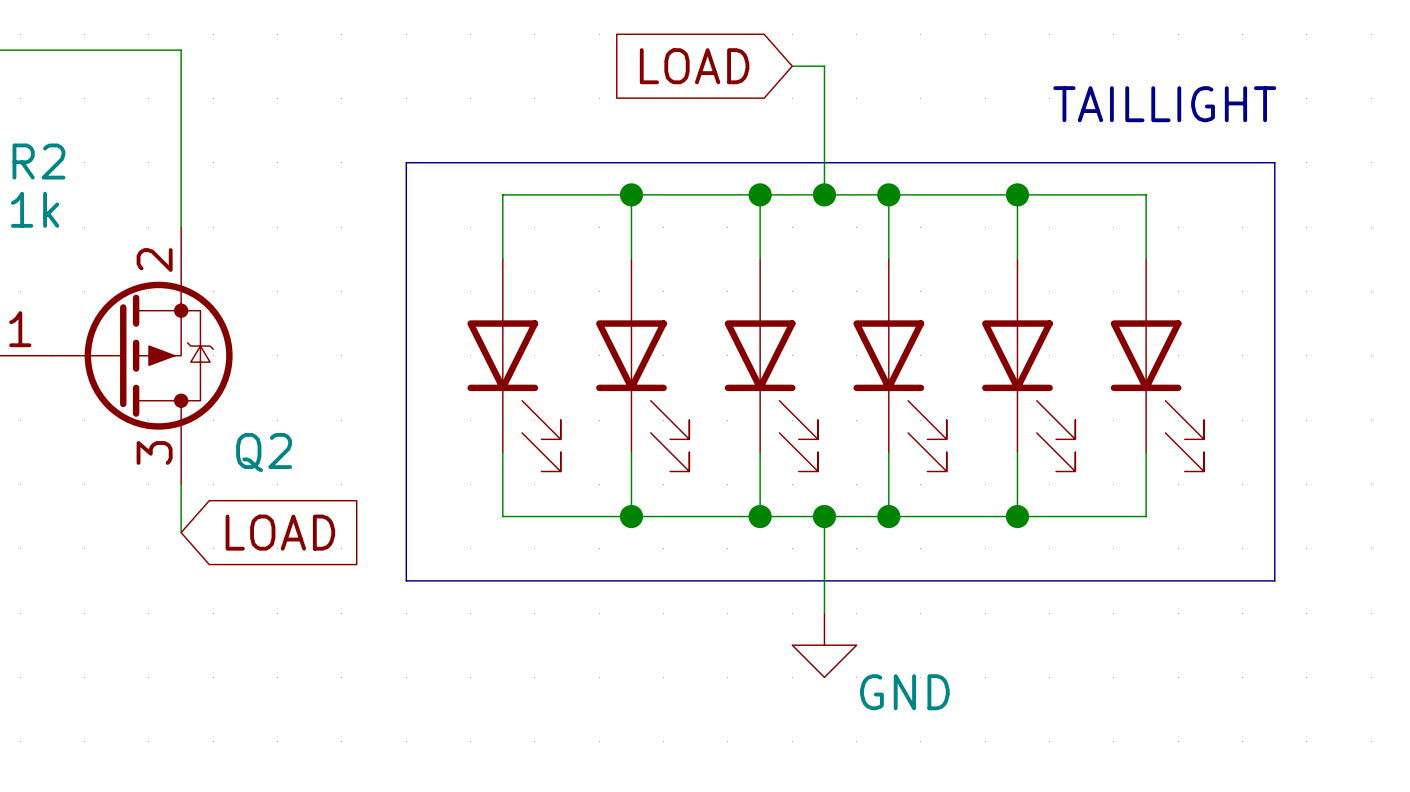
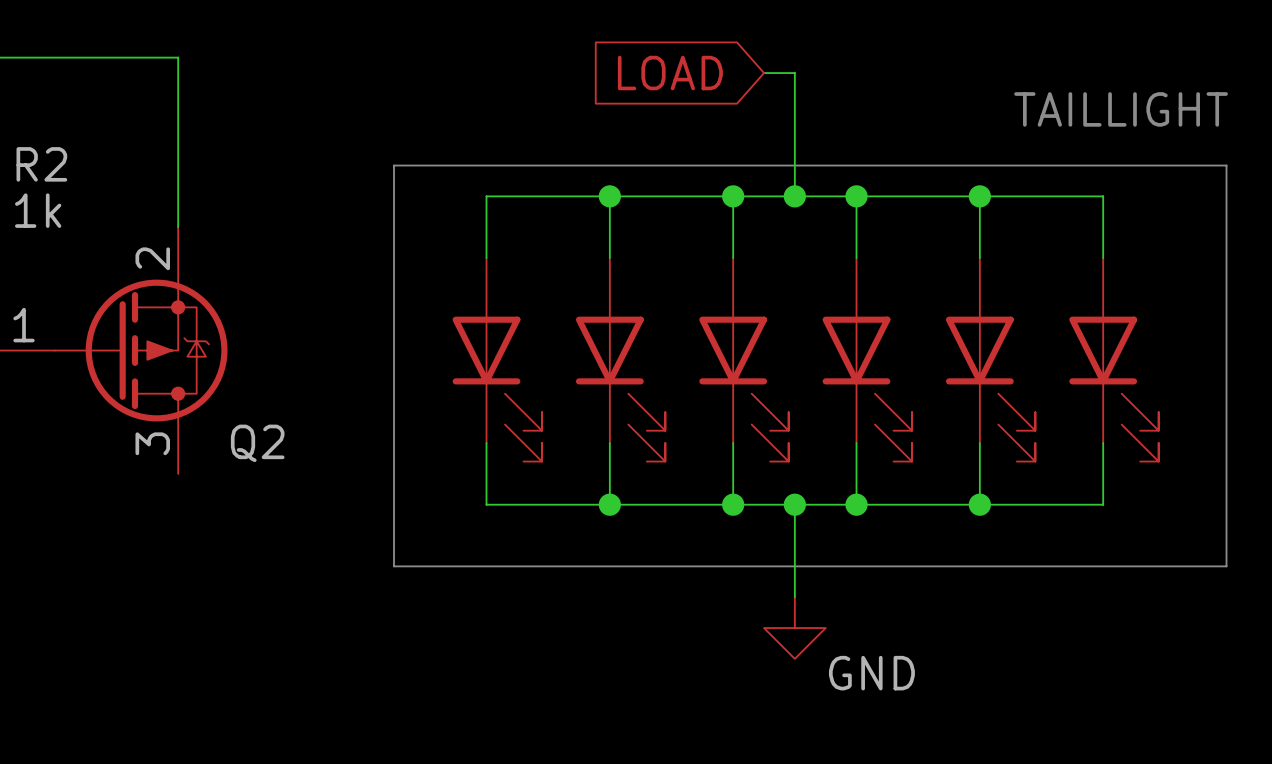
wire: (181, 484) (181, 532) -> none
global label: LOAD (280, 532) -> none

